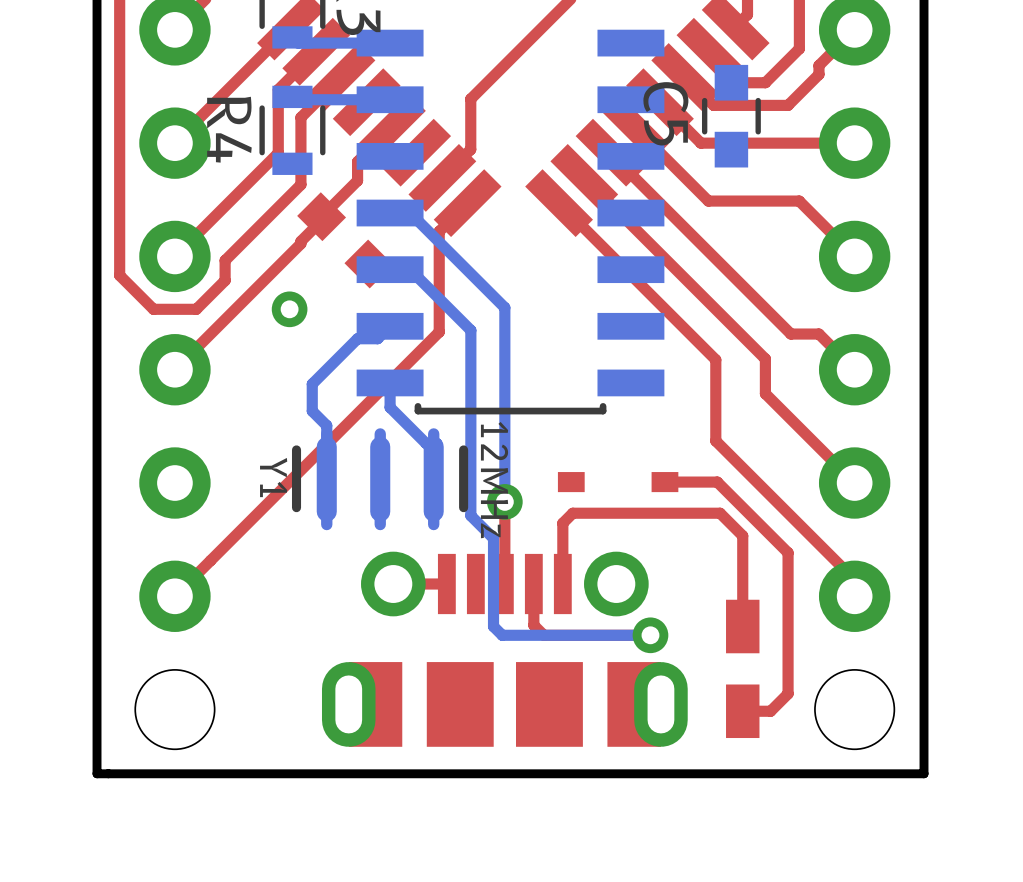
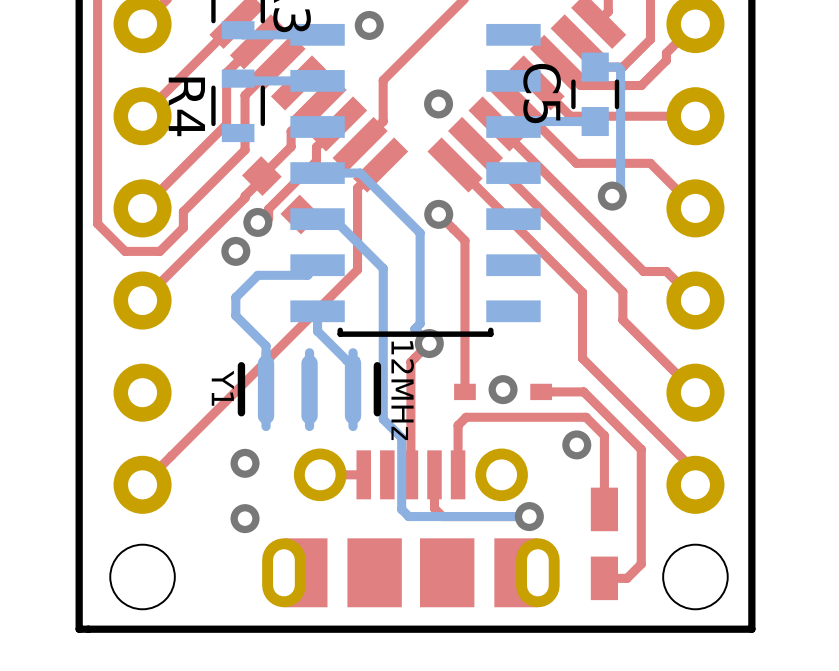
via: none -> (369, 25)
bottom track: none -> (595, 67) (617, 67) (620, 69) (620, 189) (612, 196)
via: none -> (438, 103)
bottom track: none -> (595, 121) (518, 121) (513, 126)
top track: none -> (339, 123) (316, 147) (316, 161) (268, 209) (268, 218) (264, 222) (257, 222)
bottom track: (410, 213) (504, 307) (504, 501) -> (333, 173) (360, 173) (420, 232) (420, 323) (414, 329) (429, 343)
via: none -> (612, 196)
top track: none -> (438, 214) (464, 240) (464, 391)
via: none -> (438, 214)
via: none -> (257, 222)
bottom track: (357, 338) (312, 384) (312, 411) -> (291, 275) (257, 275) (235, 297) (235, 315) (254, 334)
top track: none -> (429, 343) (410, 361) (410, 408)
via: none -> (429, 343)
via: none -> (503, 389)
via: (504, 501) -> none
via: none -> (576, 444)
via: none -> (245, 463)
via: none -> (245, 518)

